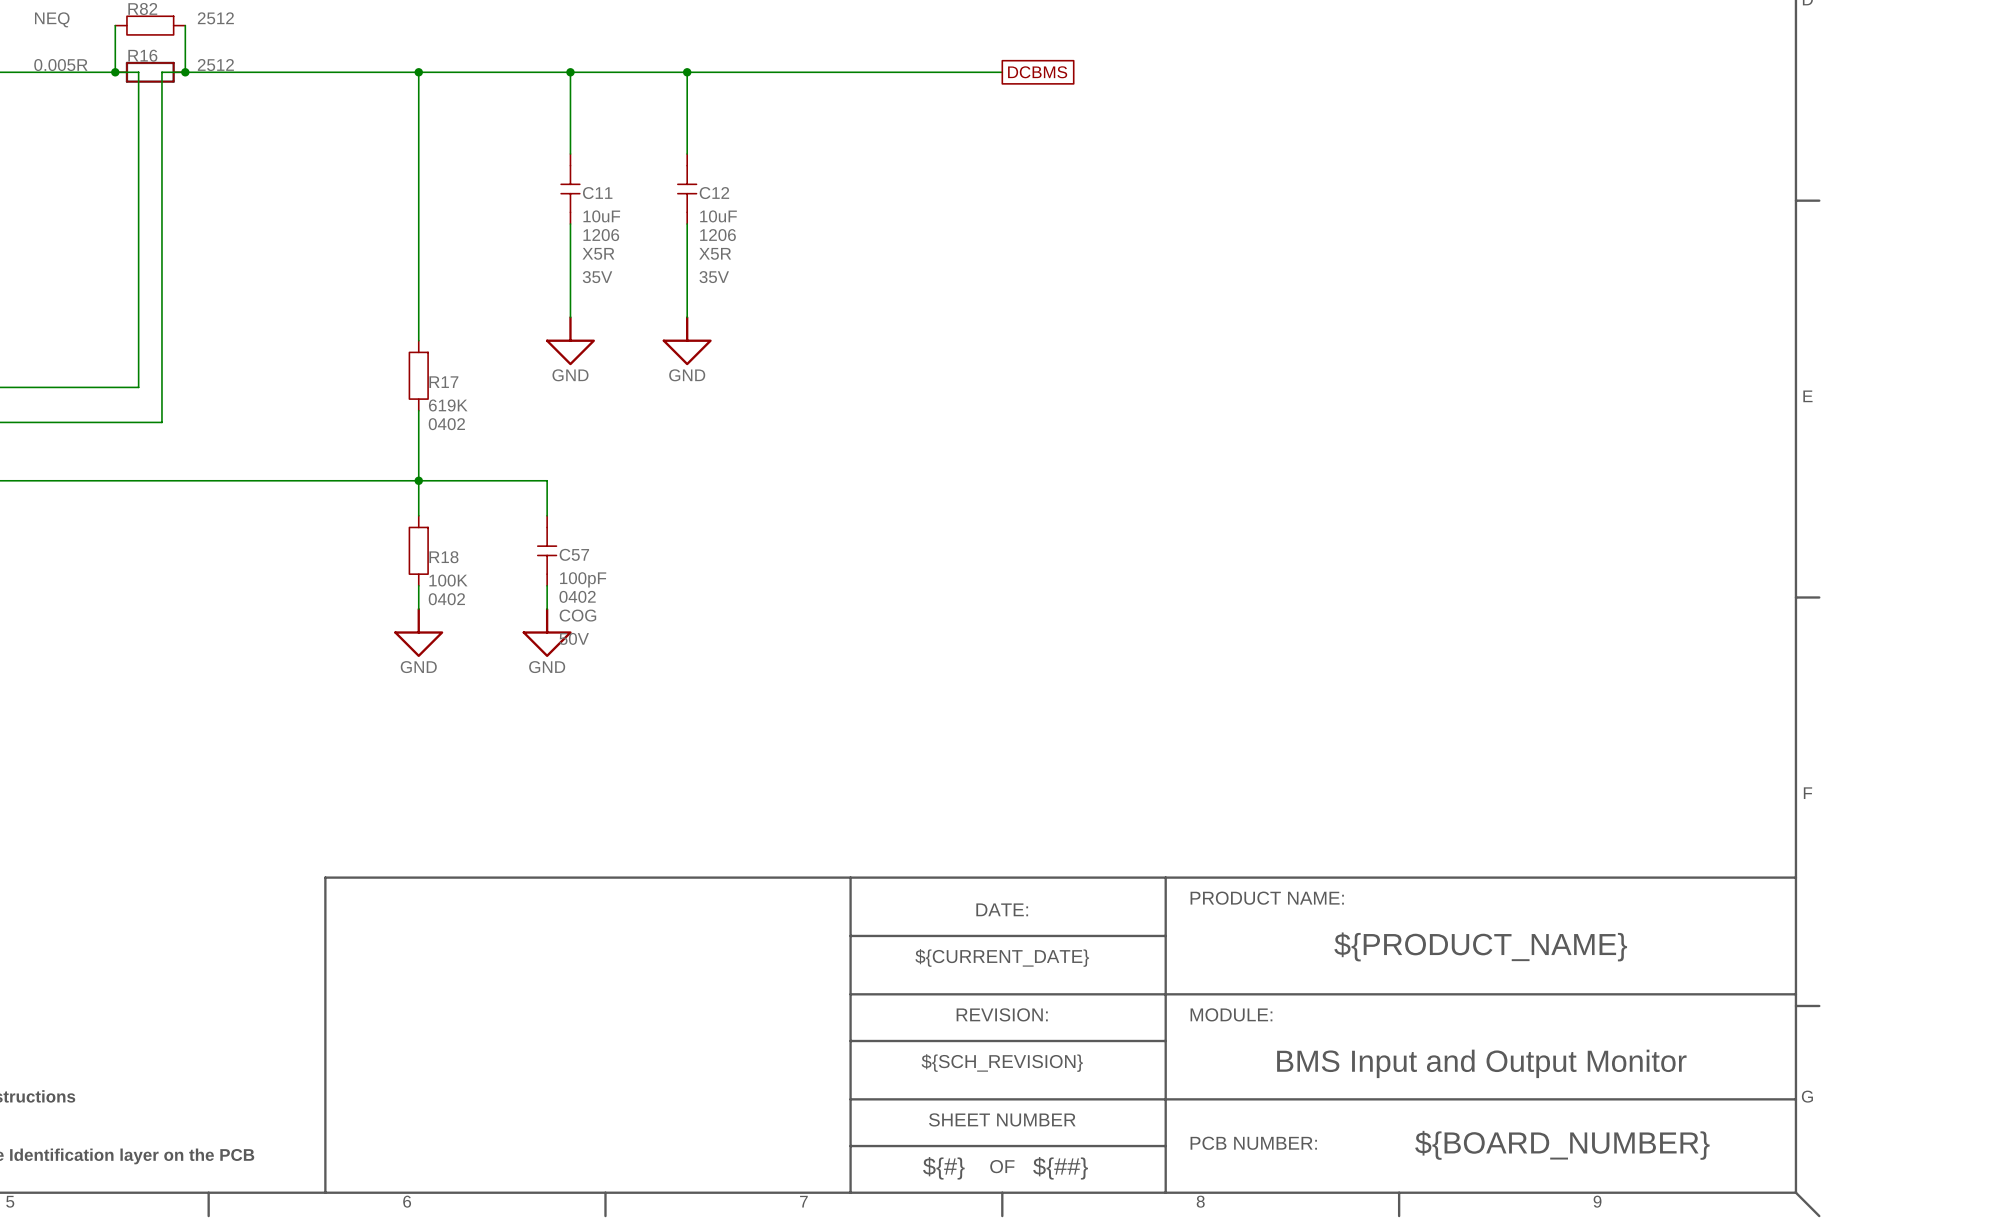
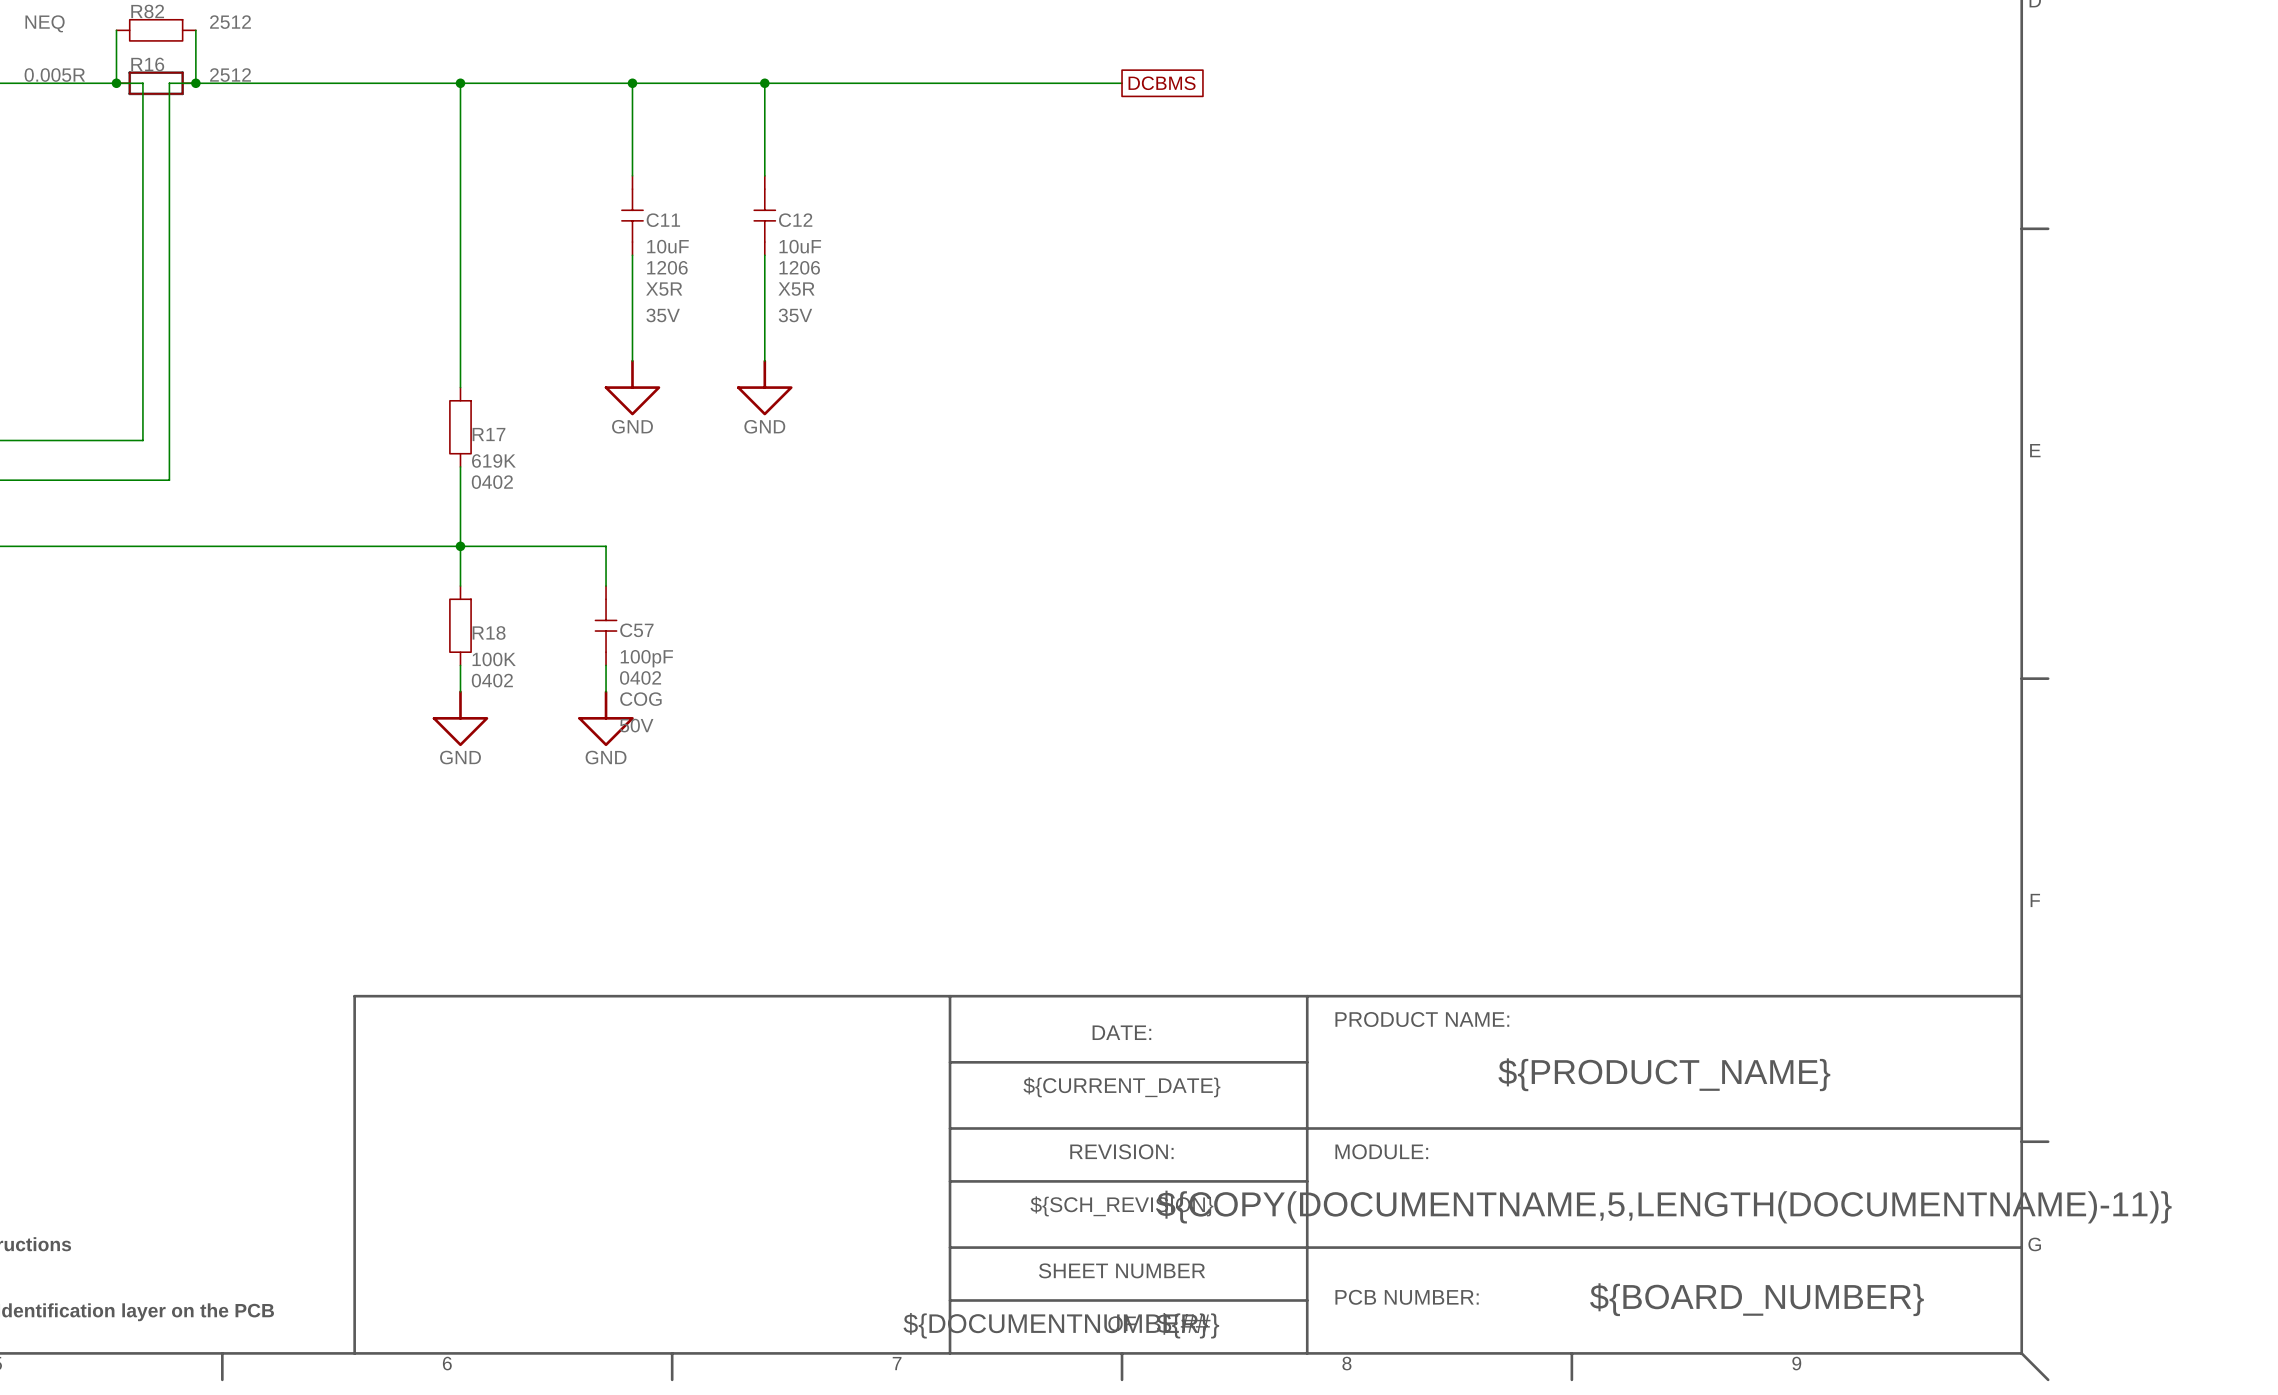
text: BMS Input and Output Monitor (1481, 1063) -> ${COPY(DOCUMENTNAME,5,LENGTH(DOCUMENTNAME)-11)} (1664, 1207)
text: ${#} (943, 1168) -> ${DOCUMENTNUMBER} (1055, 1325)

